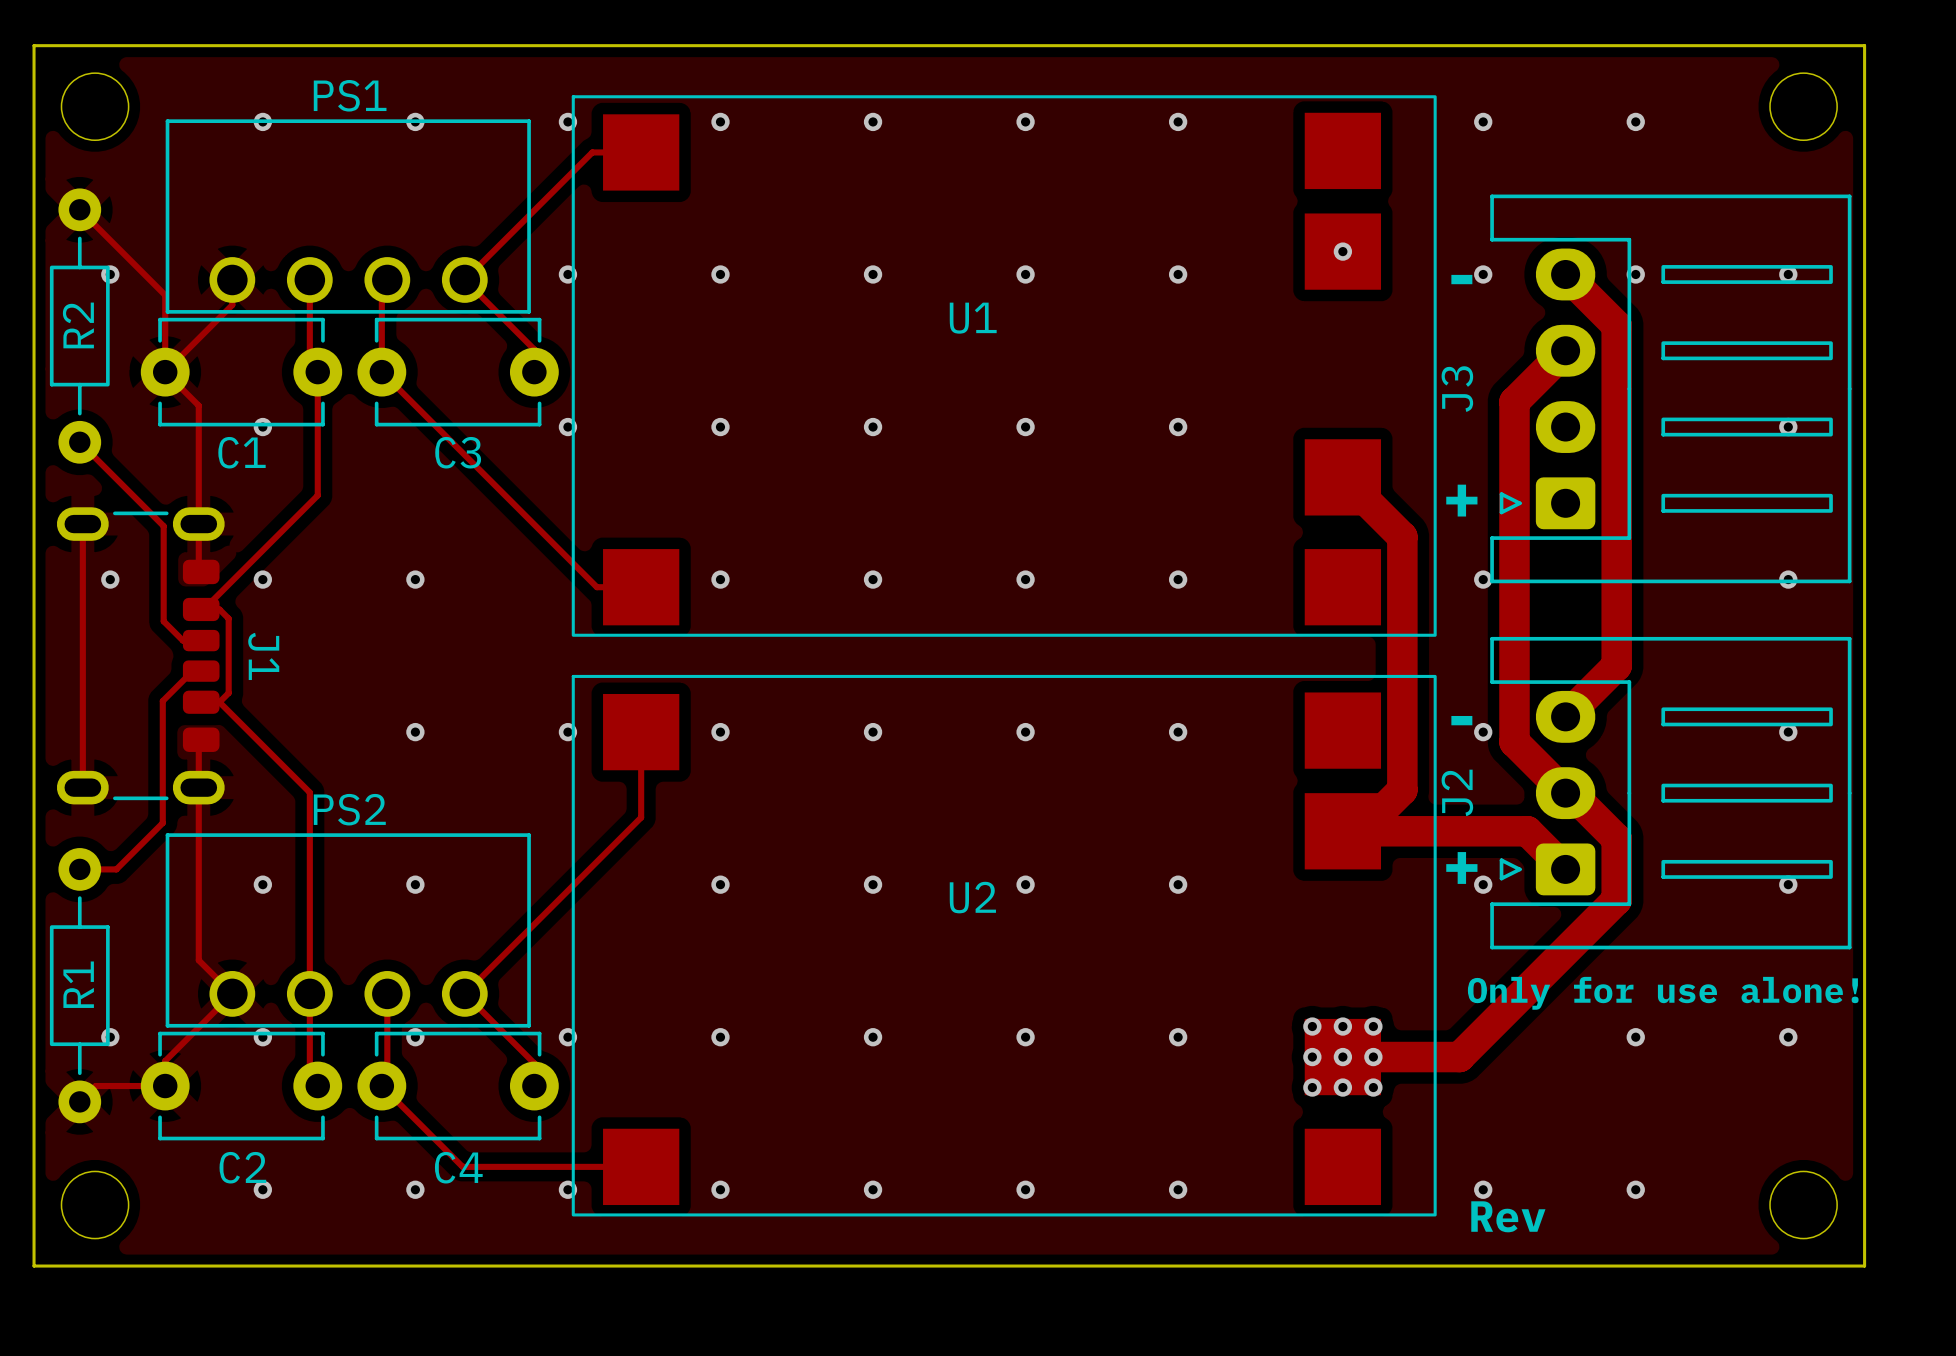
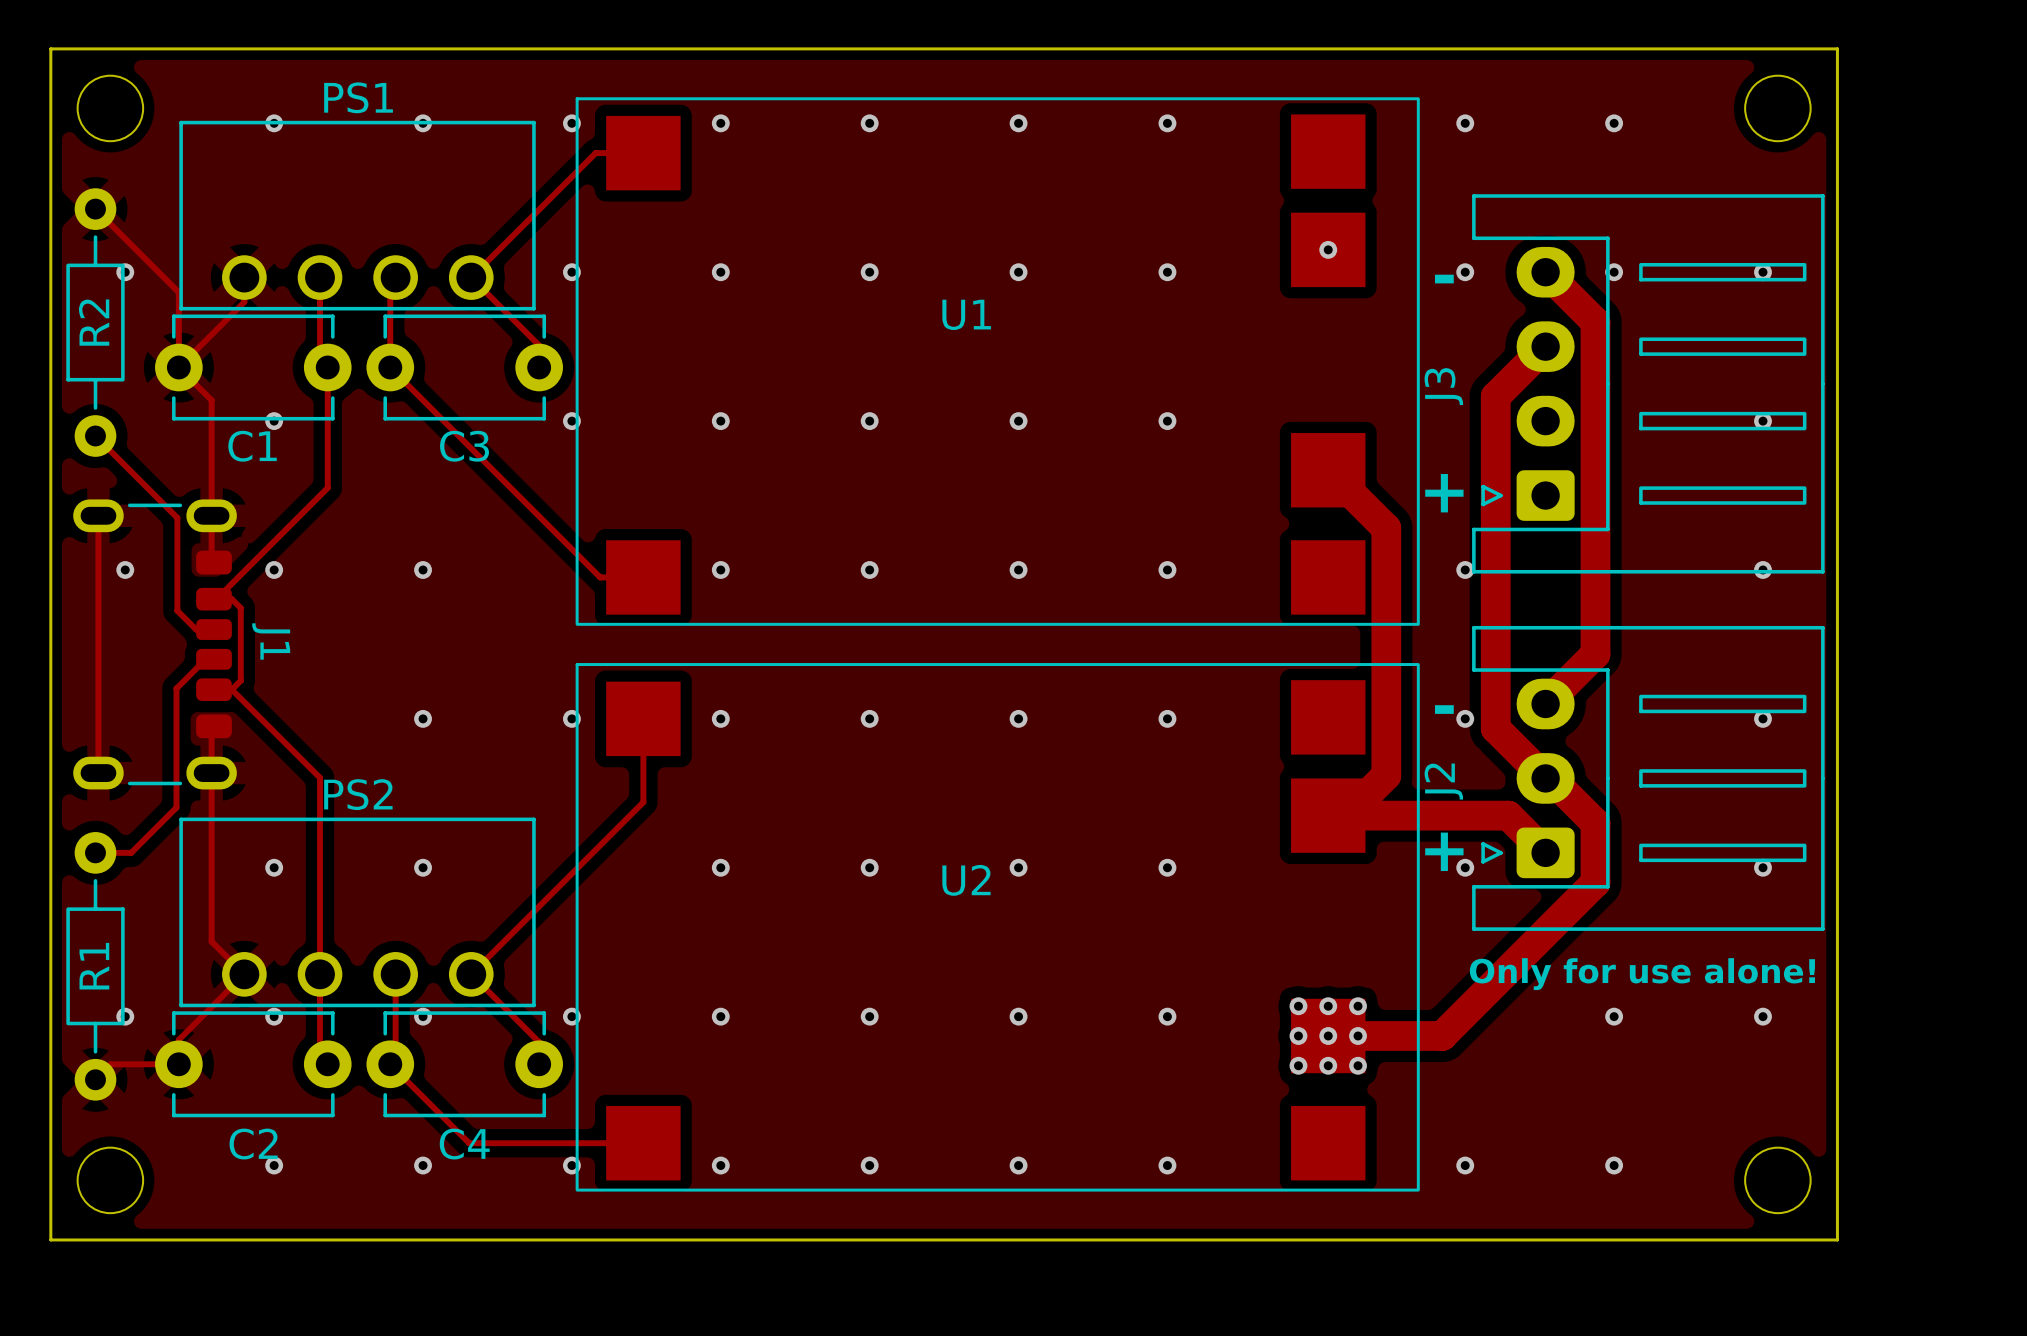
text: Rev (1508, 1216) -> none

